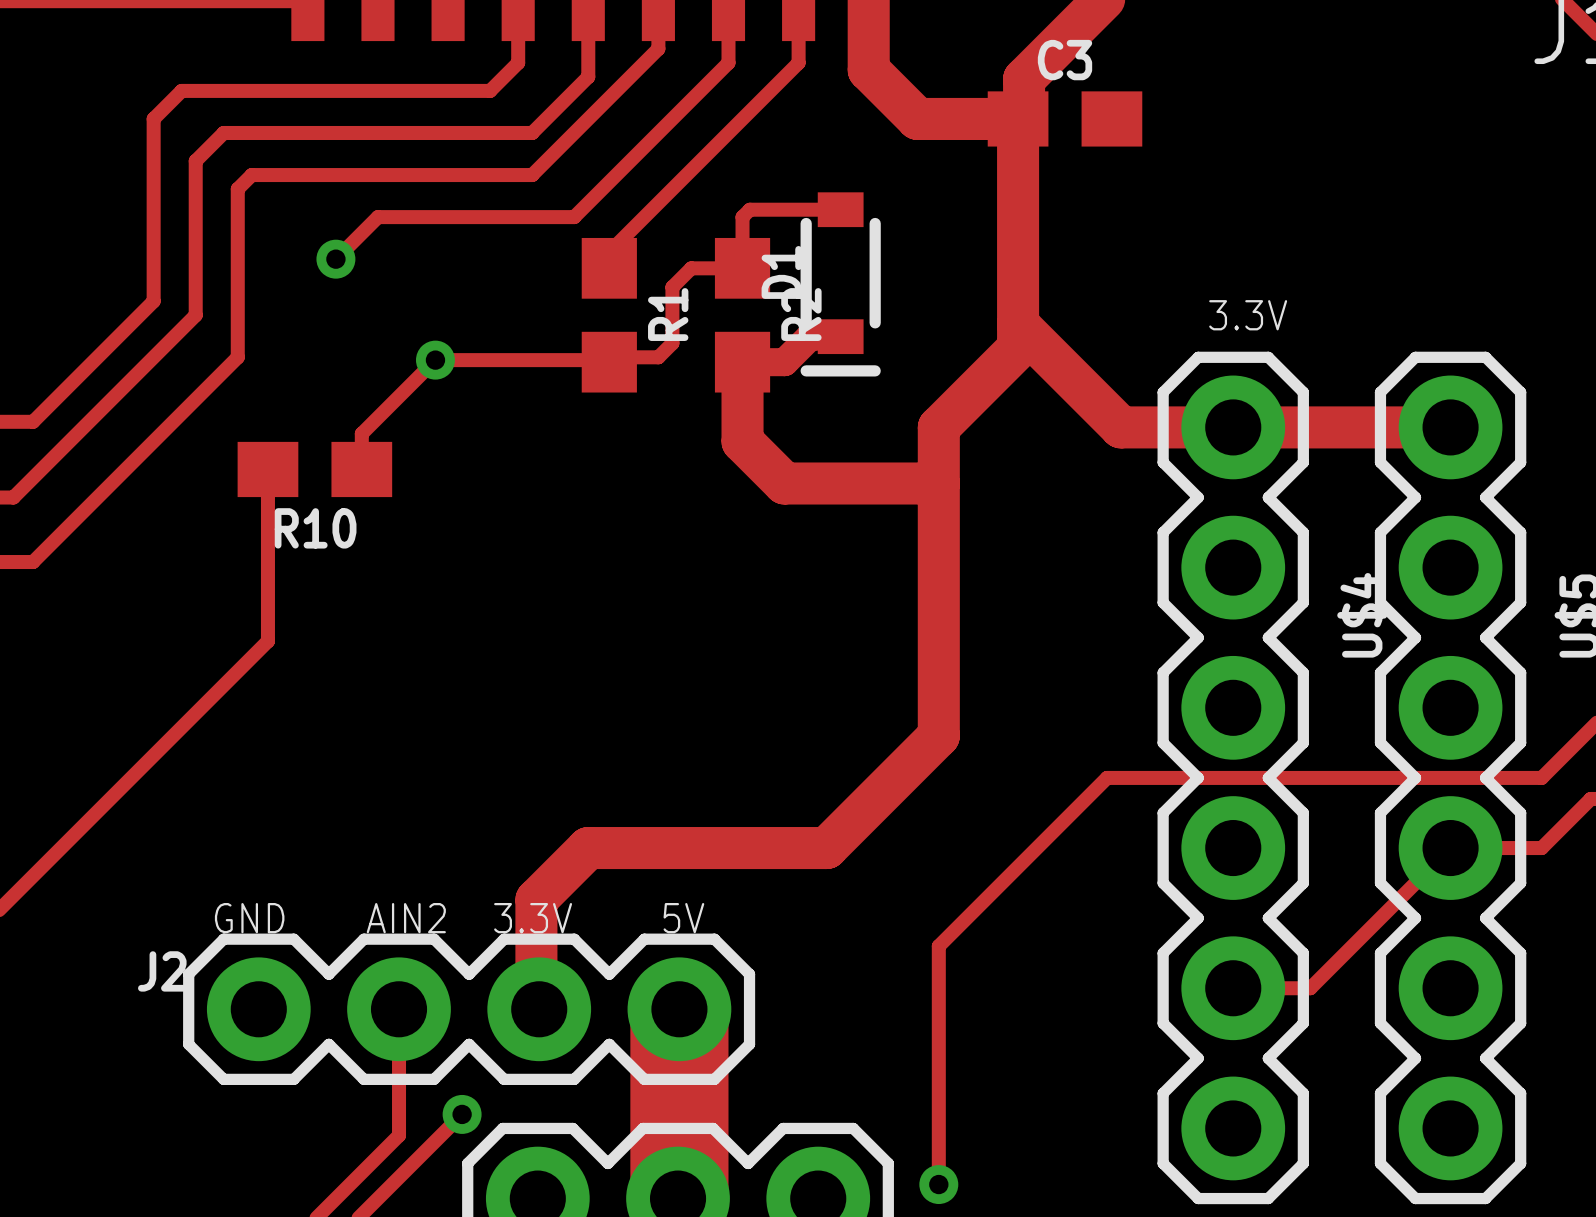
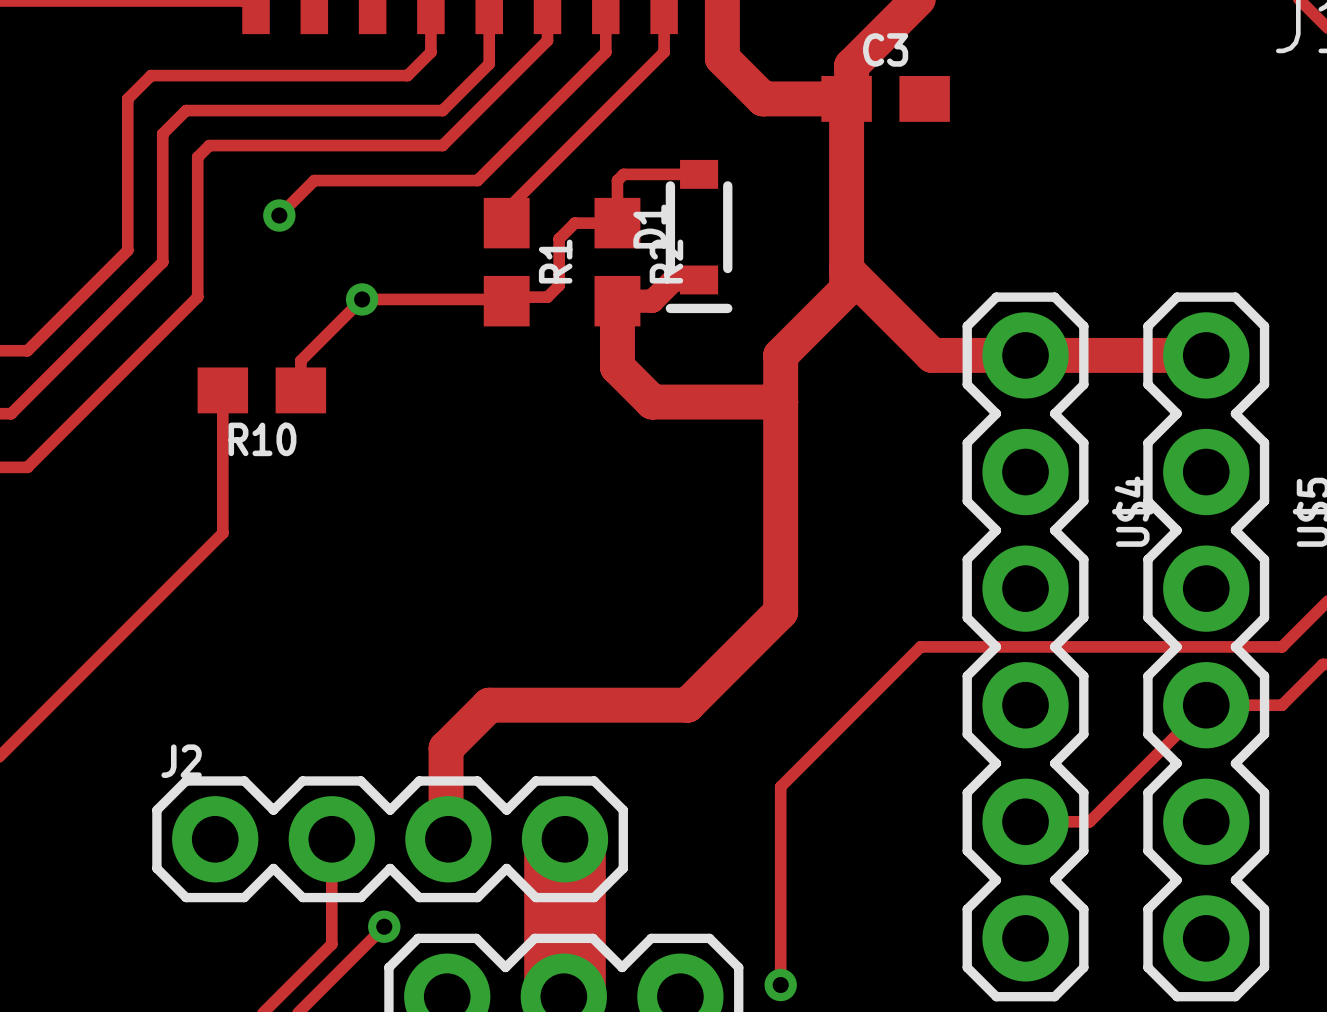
text: 3.3V (1248, 315) -> none
text: GND (249, 918) -> none
text: AIN2 (406, 918) -> none
text: 3.3V (533, 918) -> none
text: 5V (683, 918) -> none
J2 name position: J2 (162, 971) -> J2 (181, 761)

